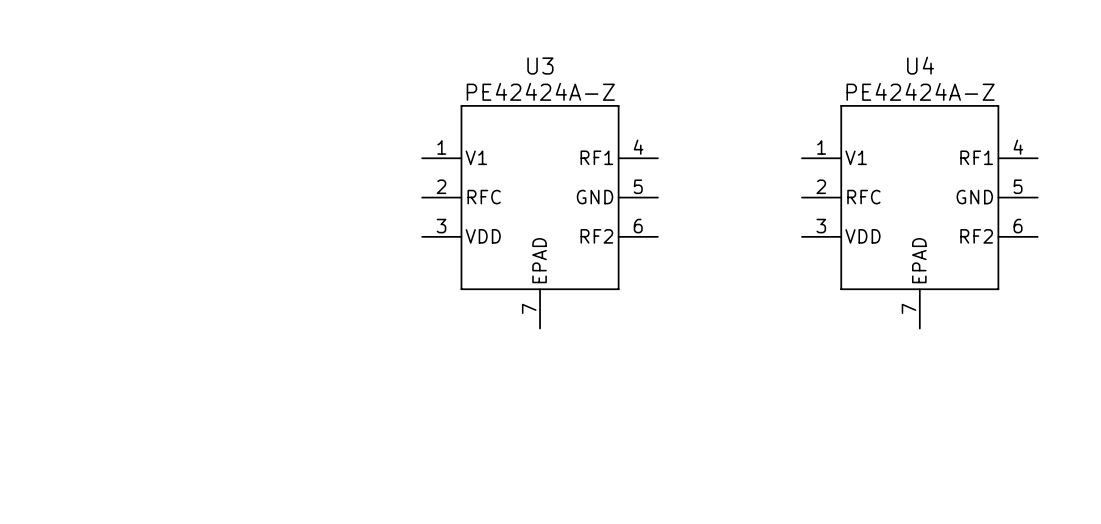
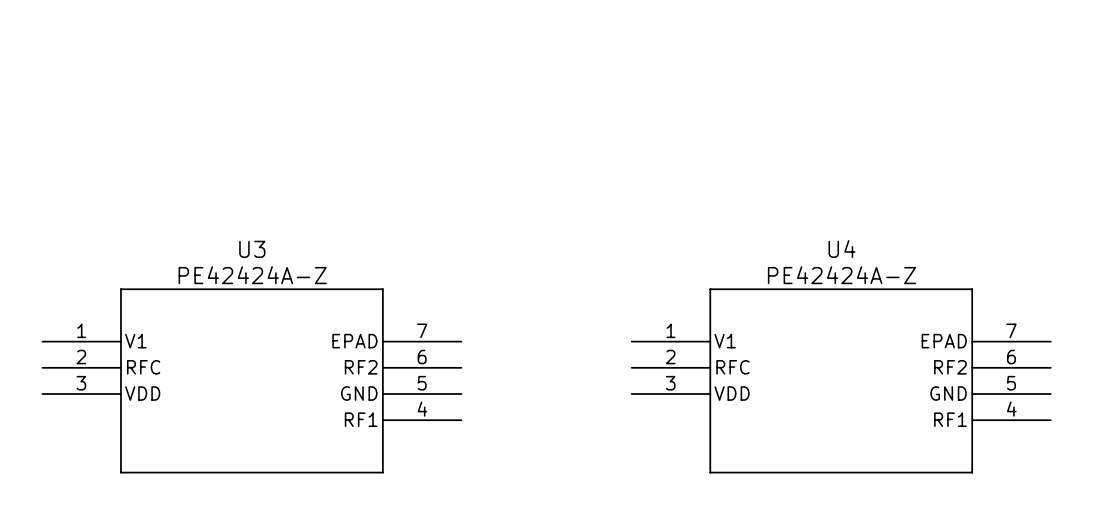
U3 symbol: [422, 105, 658, 329] -> [42, 288, 462, 474]
U4 symbol: [801, 105, 1038, 329] -> [631, 288, 1051, 474]

